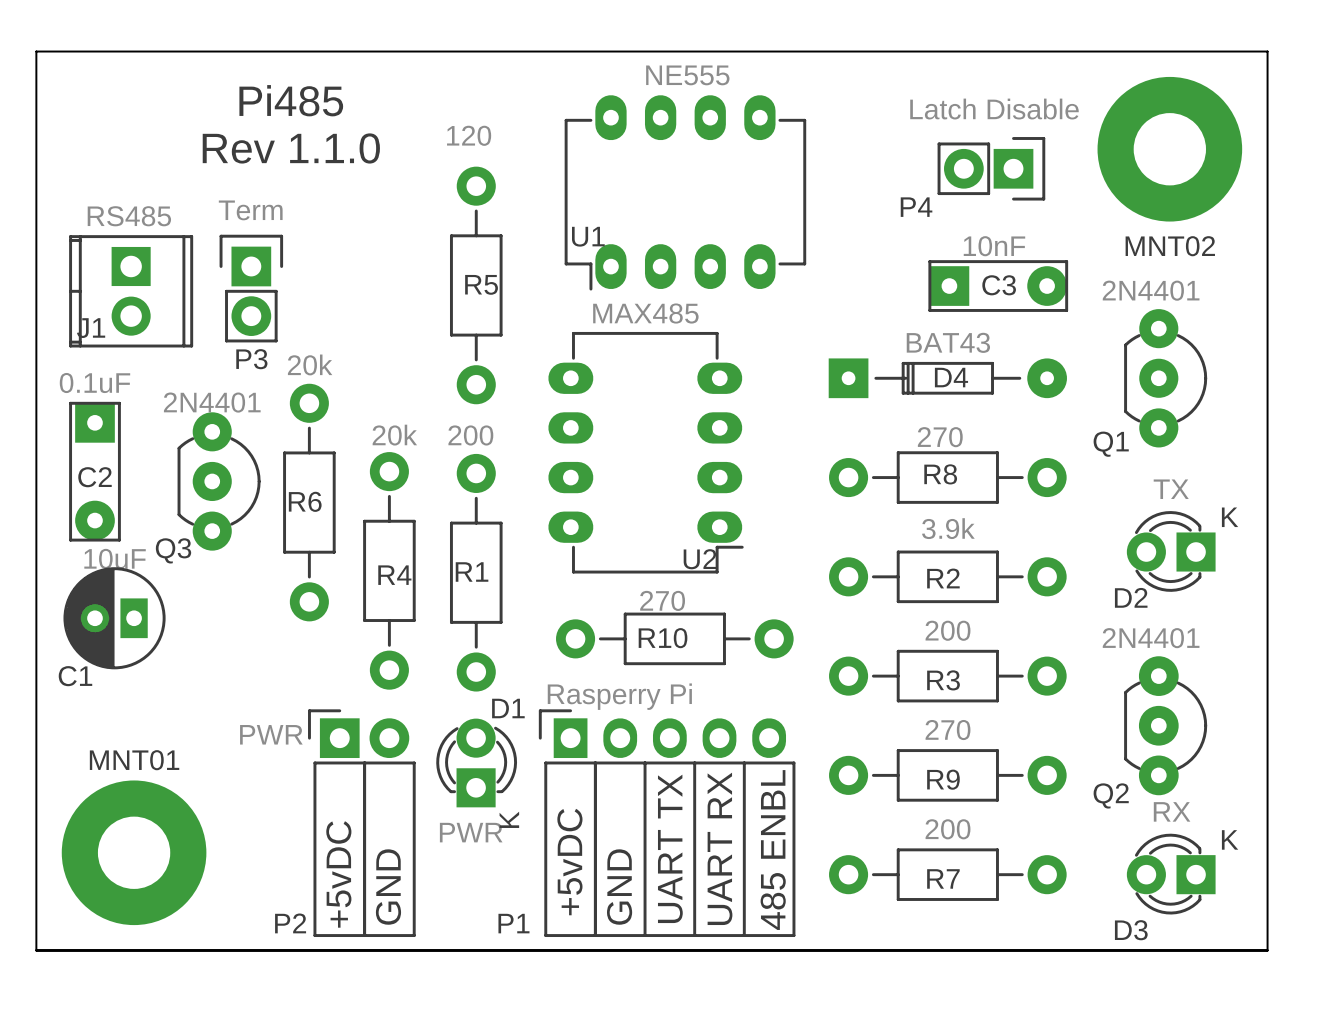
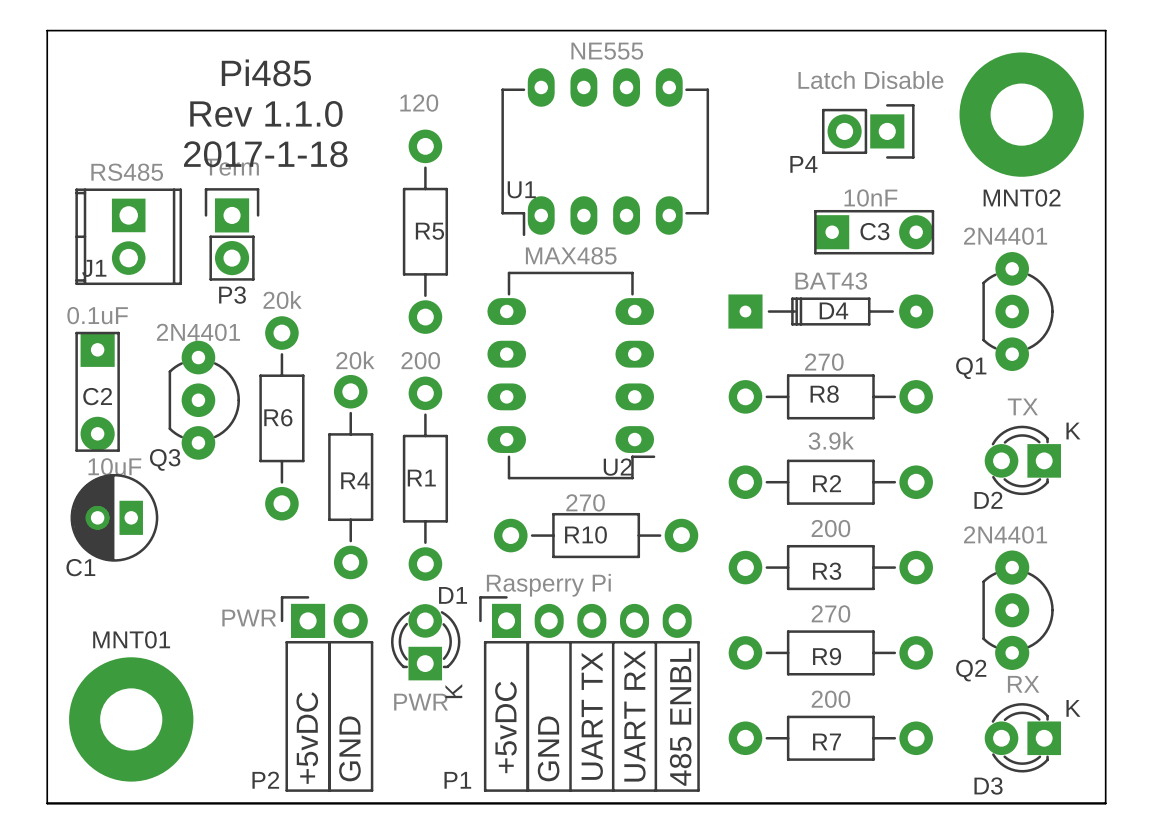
text: none -> 2017-1-18 (265, 154)

